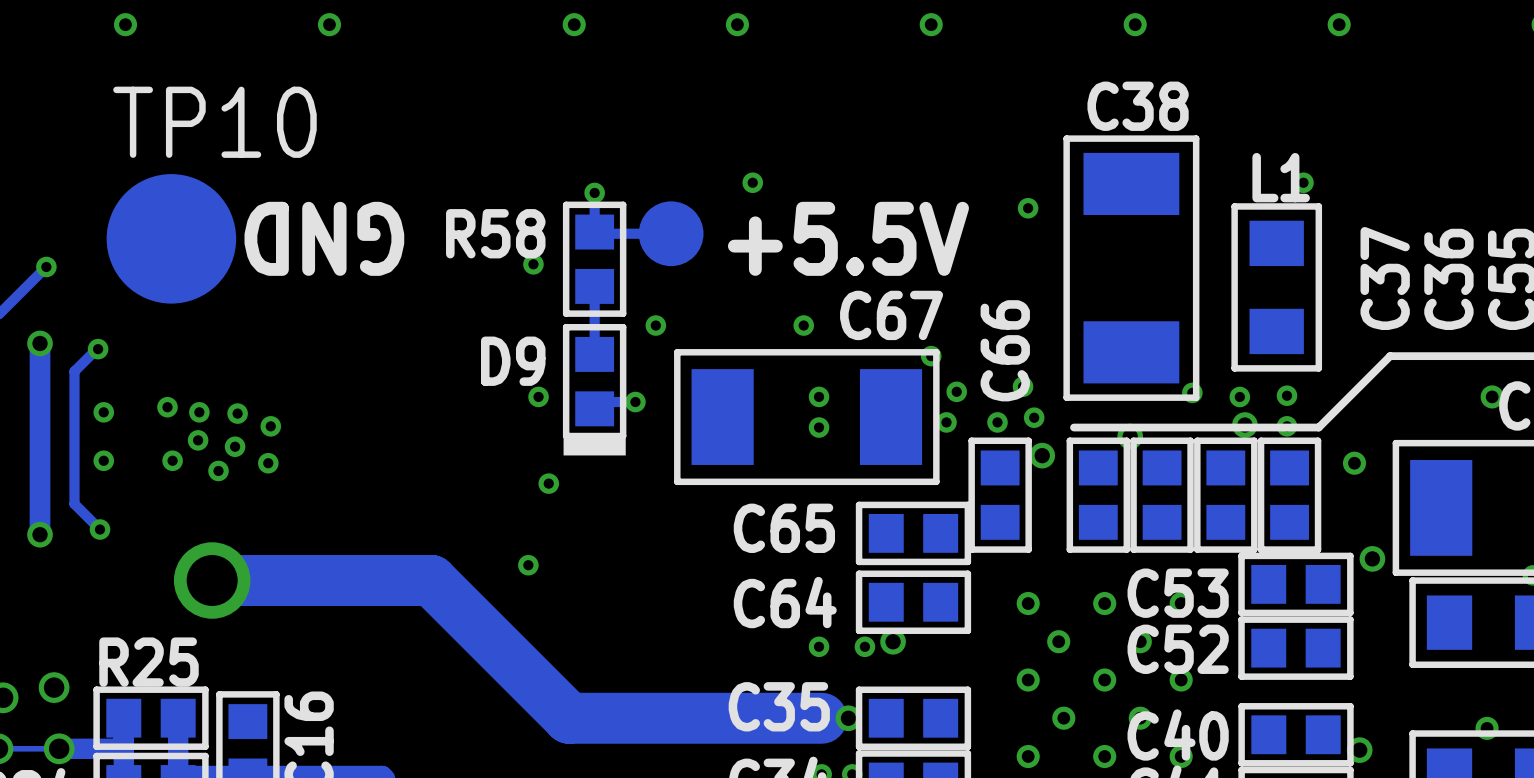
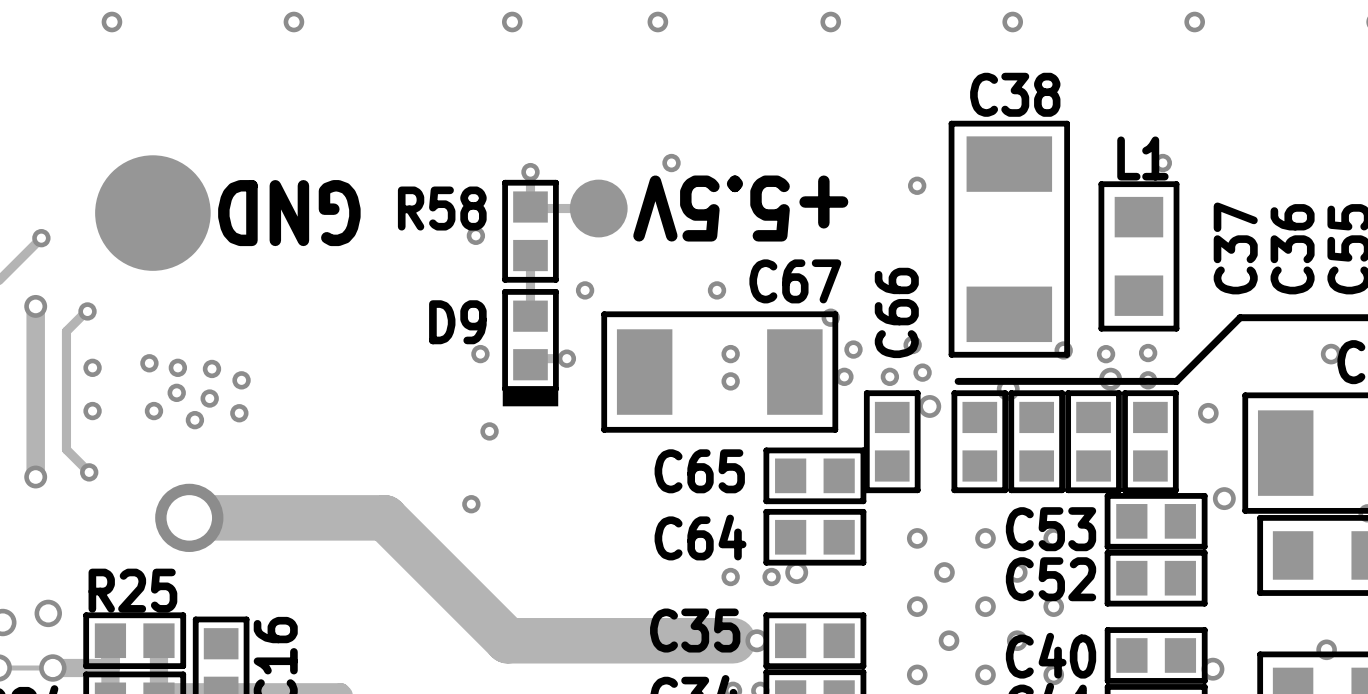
TP10 name: TP10 (214, 122) -> none
text rotation: 0° (848, 238) -> 180° (740, 208)

